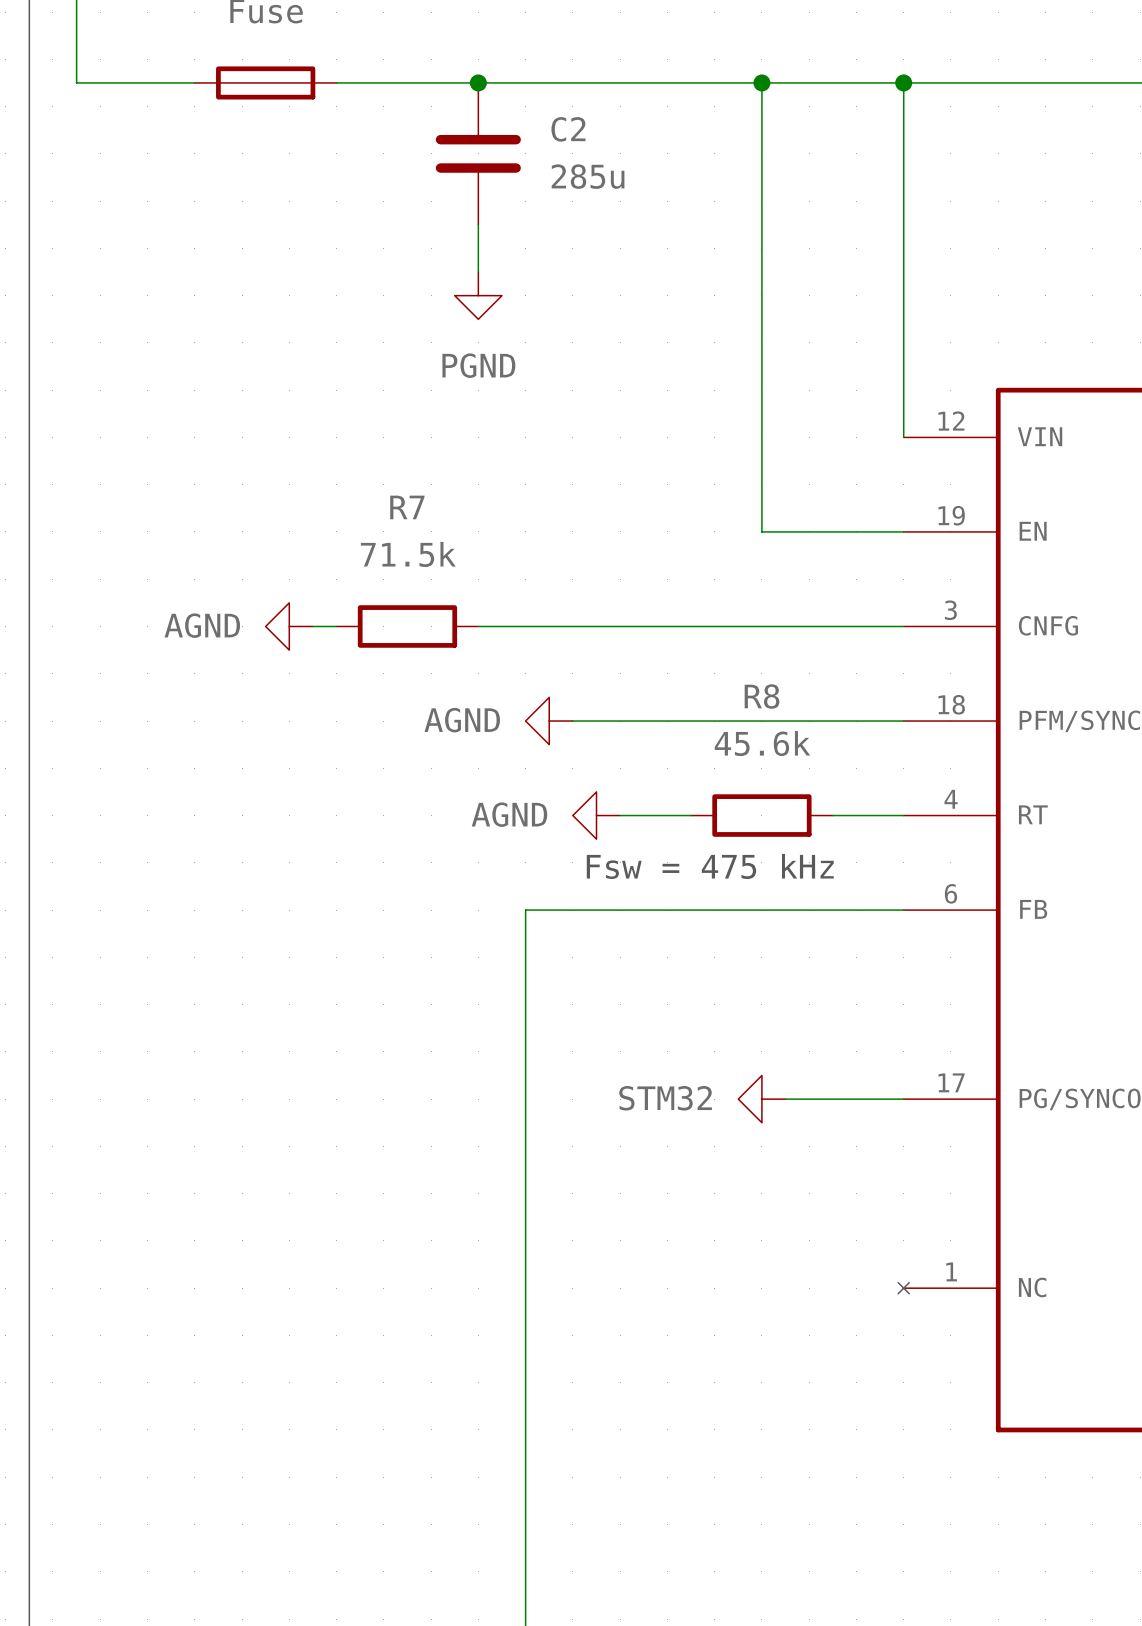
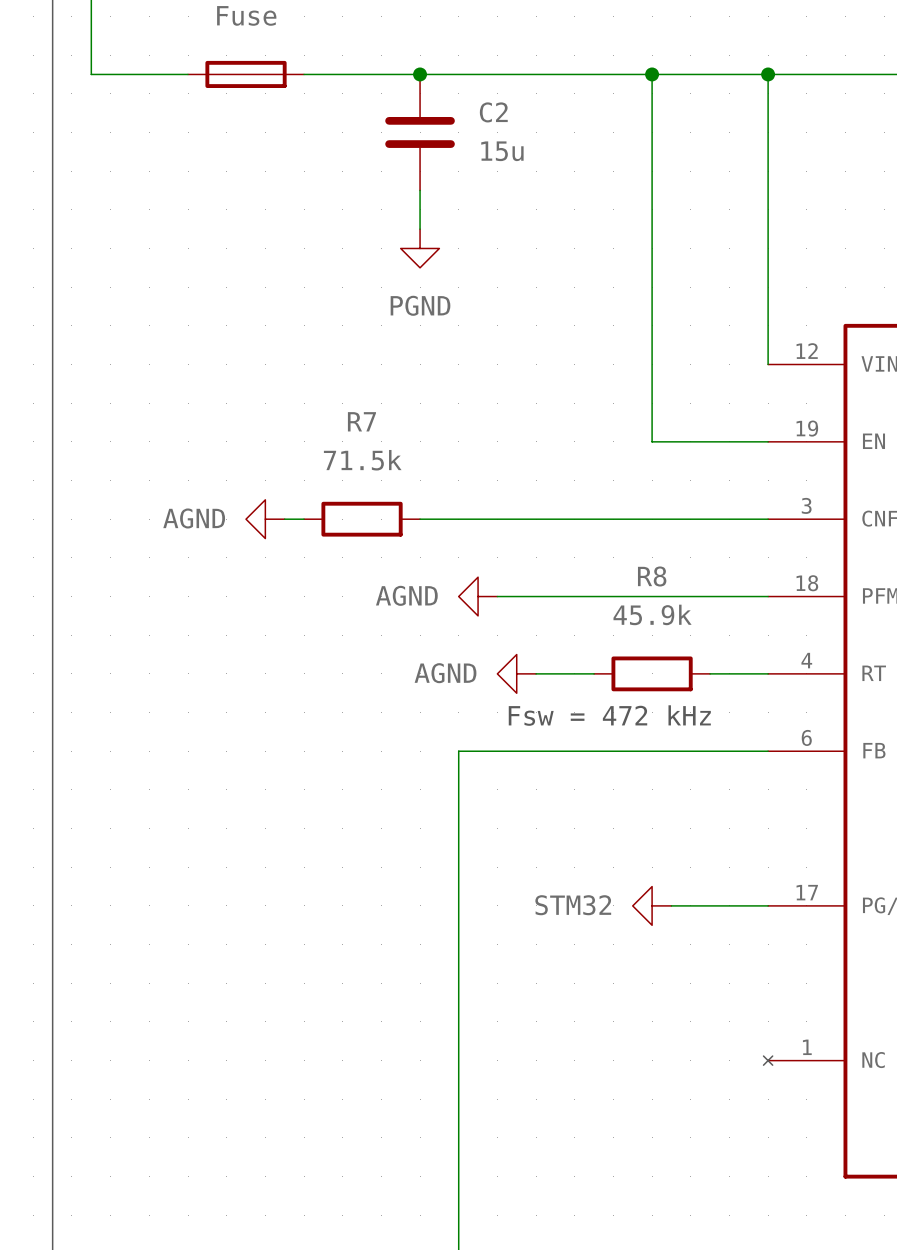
C2 value: 285u (588, 176) -> 15u (502, 151)
R8 value: 45.6k (762, 743) -> 45.9k (652, 614)
text: Fsw = 475 kHz (710, 866) -> Fsw = 472 kHz (609, 715)

